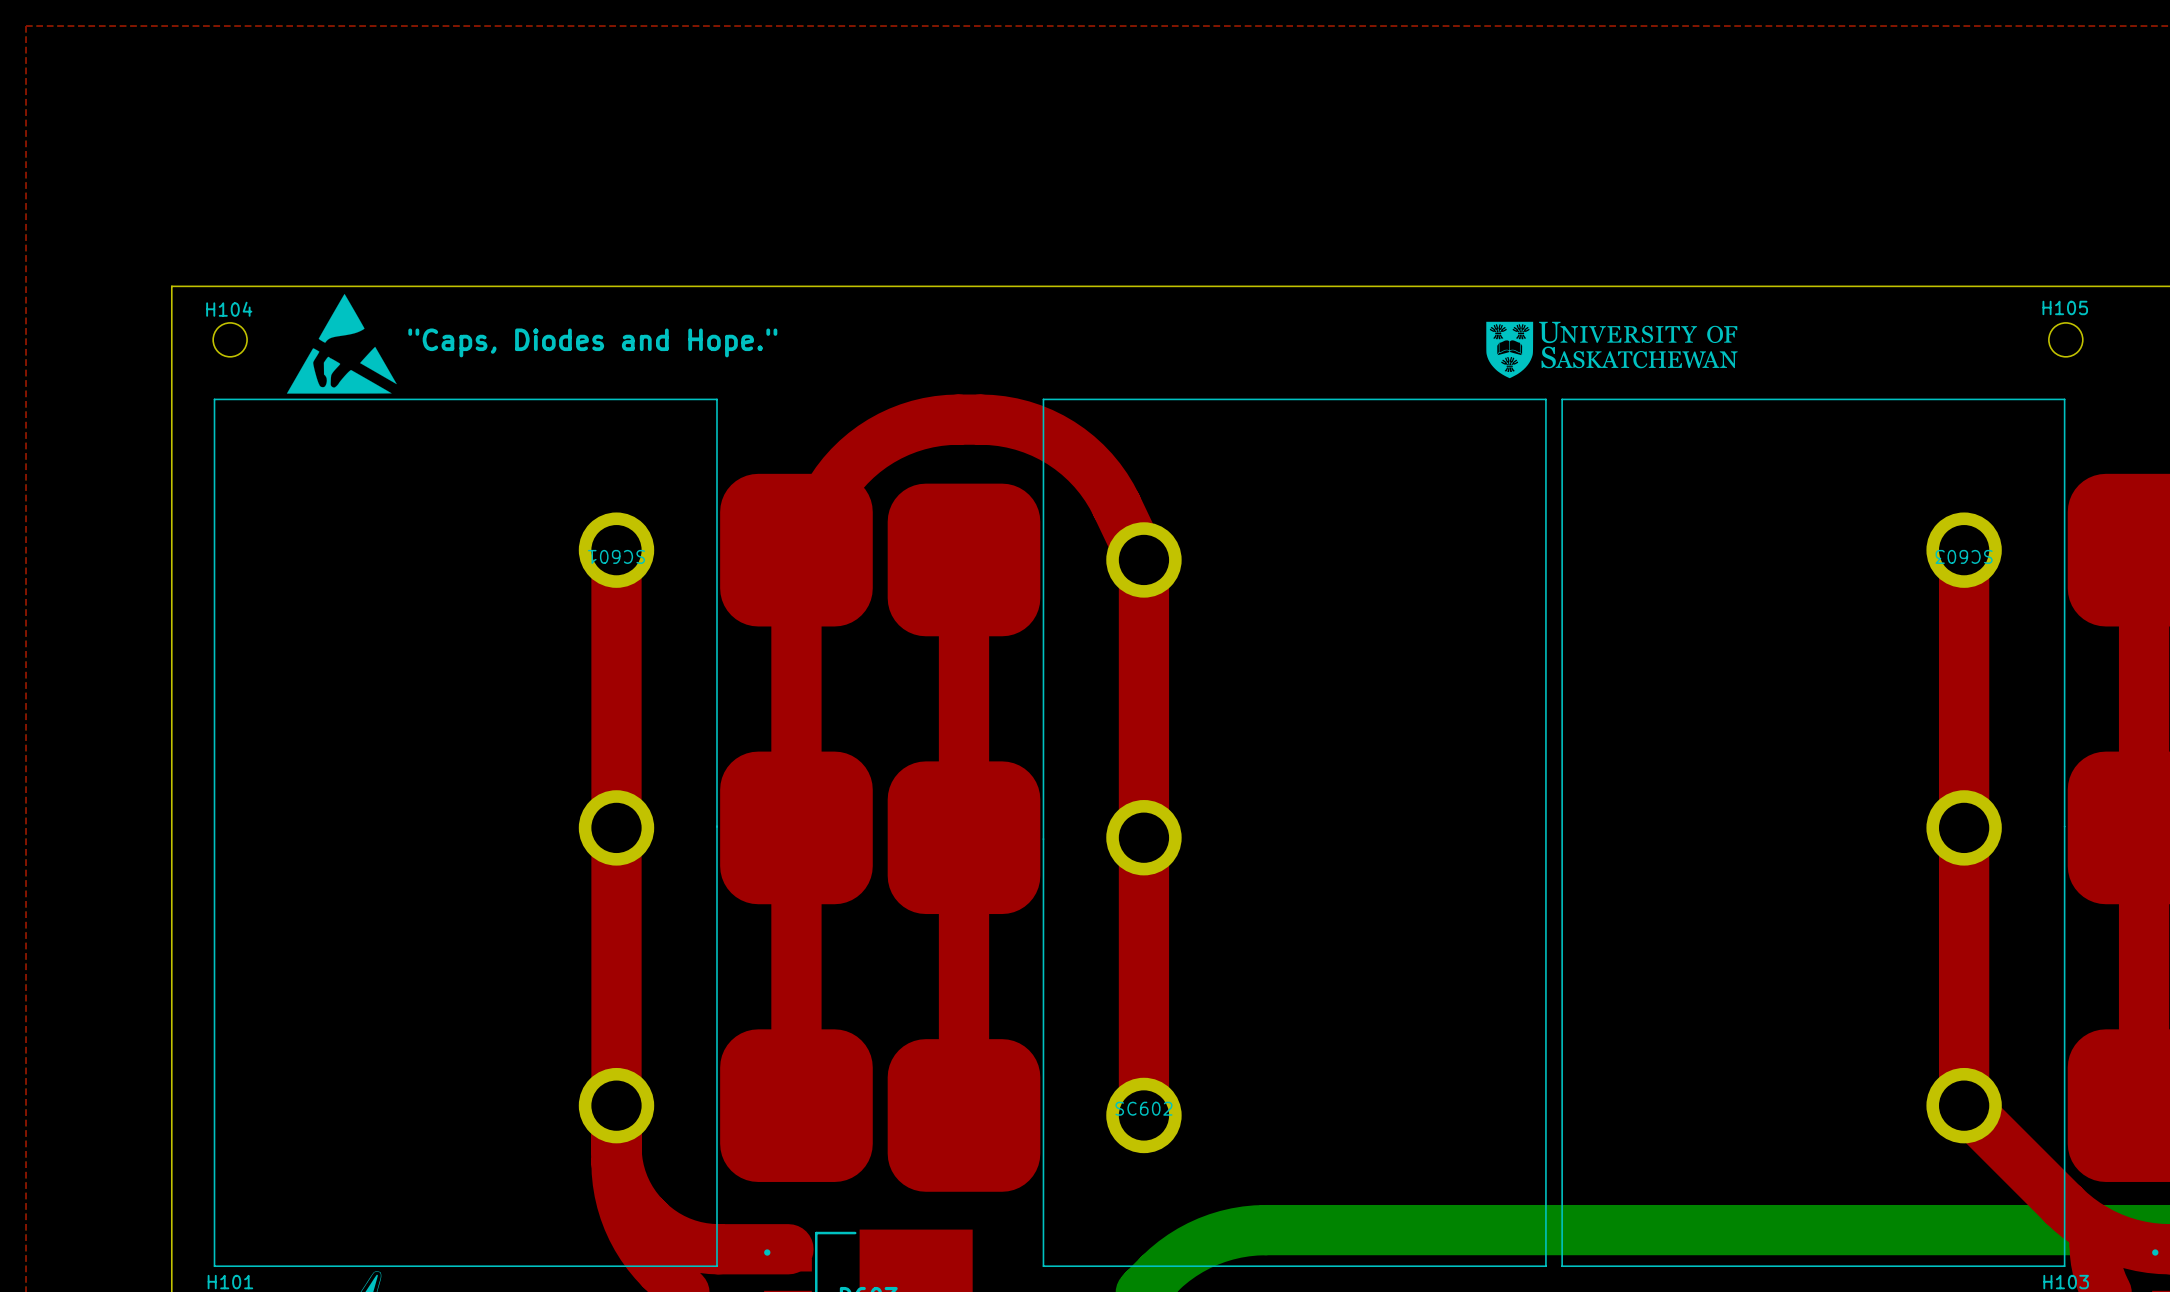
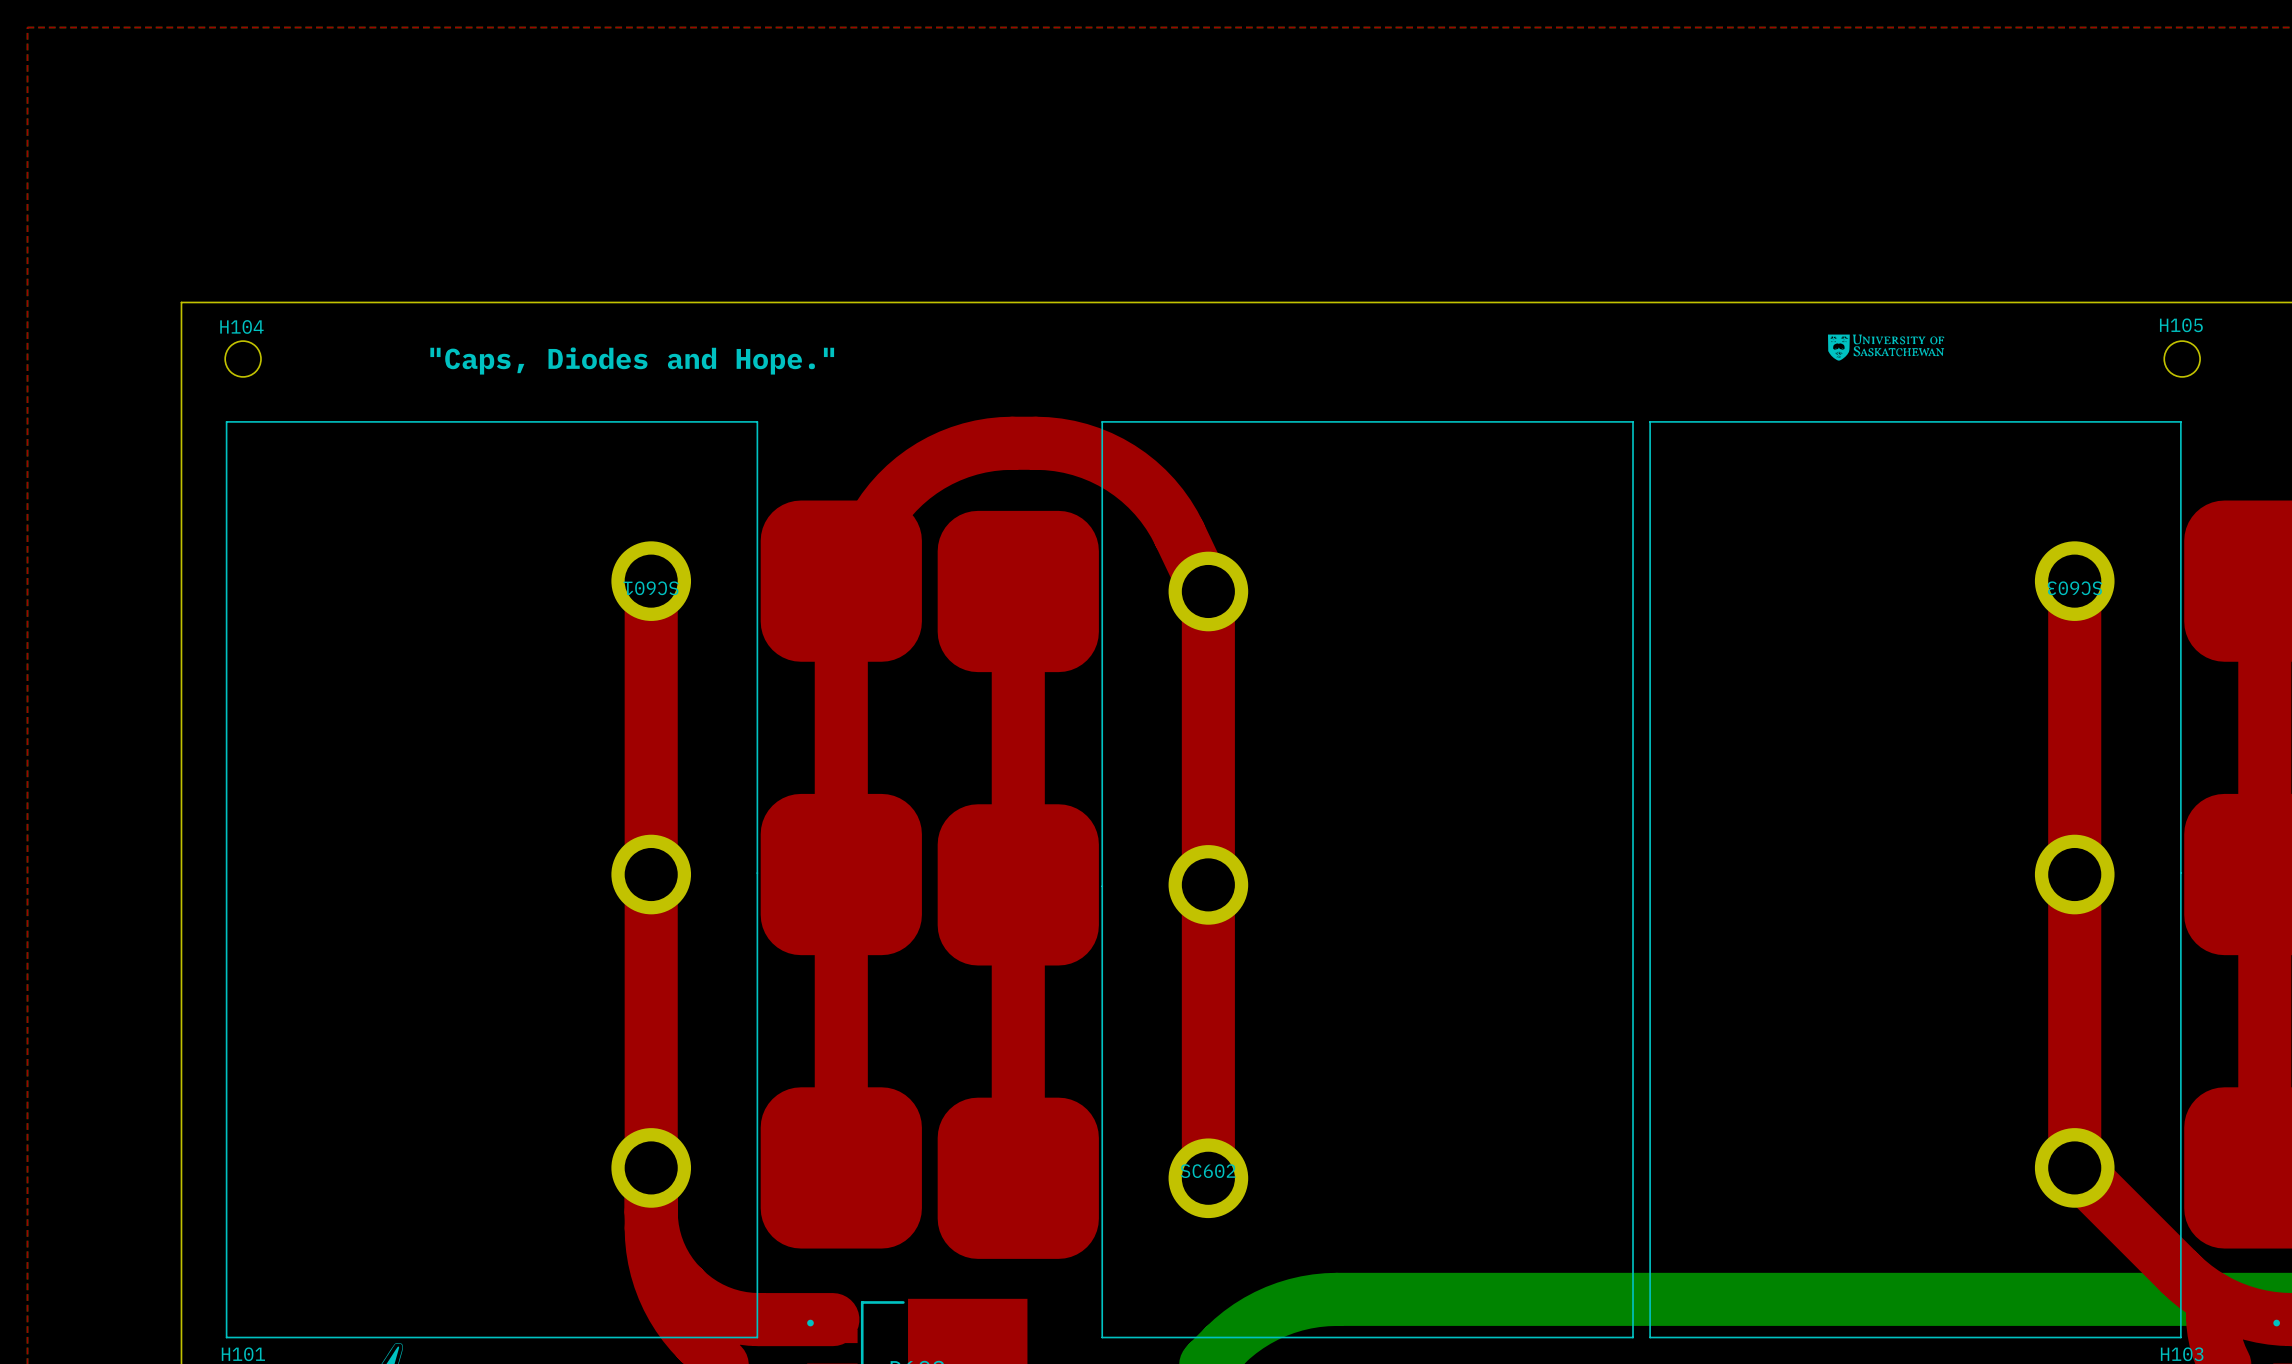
drawing: [286, 293, 397, 394] -> none
drawing: none -> [1827, 334, 1945, 361]
drawing: [1486, 321, 1738, 379] -> none

